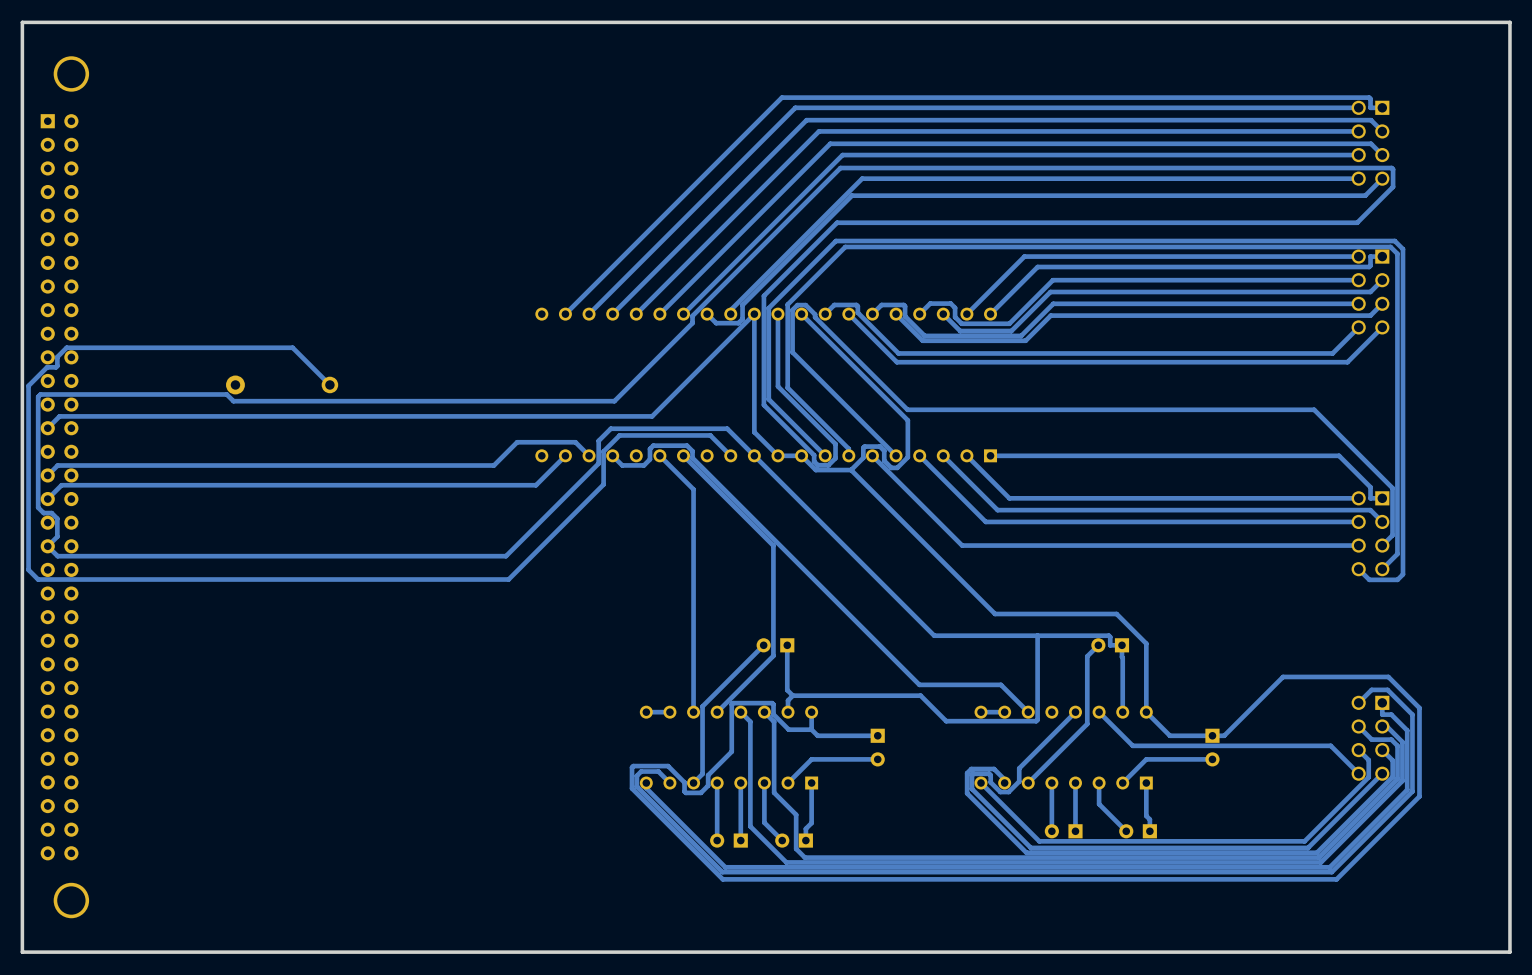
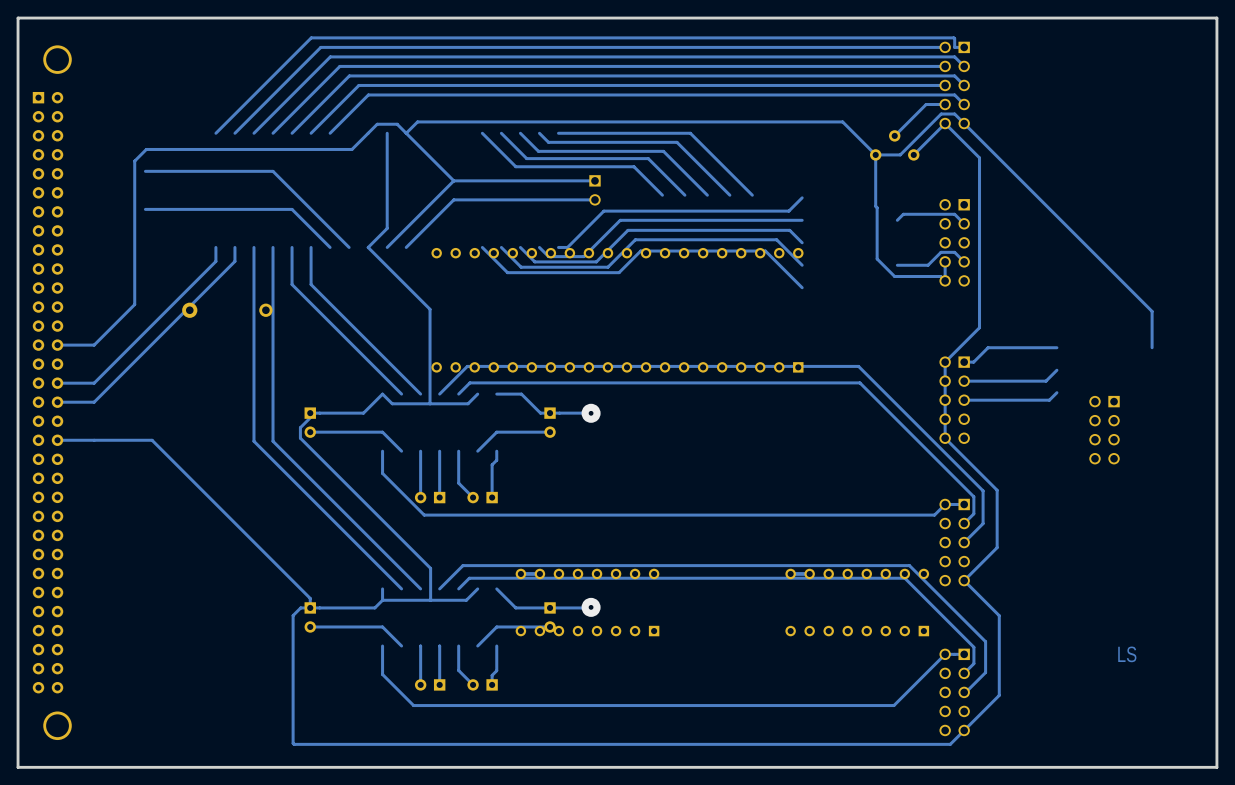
track: none -> (945, 47) (320, 47) (234, 133)
track: none -> (964, 47) (954, 47) (953, 37) (311, 37) (215, 133)
track: none -> (945, 66) (339, 66) (273, 133)
track: none -> (964, 66) (954, 56) (330, 56) (253, 133)
track: none -> (945, 85) (358, 85) (311, 133)
part: none -> (954, 85)
track: none -> (964, 85) (954, 75) (349, 75) (292, 133)
track: (1358, 107) (795, 107) (589, 314) -> none
track: (1382, 107) (1370, 107) (1369, 97) (781, 97) (565, 314) -> none
track: none -> (945, 104) (926, 104) (894, 135)
track: none -> (964, 104) (954, 94) (368, 94) (330, 133)
track: (1358, 131) (818, 131) (636, 314) -> none
track: (1382, 131) (1371, 120) (806, 120) (612, 314) -> none
part: (1370, 143) -> none
track: (1358, 155) (842, 155) (683, 314) -> none
track: (1382, 155) (1371, 143) (830, 143) (659, 314) -> none
track: none -> (387, 133) (387, 228) (368, 247) (430, 309) (430, 403)
track: none -> (406, 133) (417, 121) (842, 121) (875, 154)
track: none -> (482, 133) (515, 166) (633, 166) (662, 195)
track: none -> (501, 133) (526, 158) (648, 158) (684, 195)
track: none -> (520, 133) (538, 151) (663, 151) (707, 195)
track: none -> (539, 133) (548, 142) (676, 142) (729, 195)
track: none -> (558, 133) (690, 133) (752, 195)
track: (1358, 178) (862, 178) (730, 310) (730, 314) -> none
track: (1382, 178) (1365, 195) (852, 195) (742, 305) (742, 319) (738, 323) (716, 323) (707, 314) -> none
part: none -> (894, 145)
track: none -> (875, 154) (900, 154) (941, 114) (954, 114) (1152, 311) (1152, 347)
track: none -> (875, 154) (877, 258) (894, 276) (940, 276) (945, 280) (945, 261)
track: none -> (913, 154) (945, 123) (979, 157) (979, 327) (945, 362) (945, 438) (997, 490) (997, 547) (964, 580) (999, 615) (999, 695) (950, 744) (294, 744) (293, 615) (300, 607) (374, 607) (382, 600)
track: none -> (145, 171) (273, 171) (349, 247)
track: none -> (595, 180) (453, 180)
part: none -> (595, 190)
track: none -> (802, 197) (788, 211) (603, 211) (567, 247) (558, 247)
track: none -> (595, 199) (453, 199) (406, 247)
track: (1358, 256) (1024, 256) (966, 314) -> none
track: (1382, 256) (1370, 256) (1369, 266) (1037, 266) (990, 314) -> none
track: none -> (145, 209) (292, 209) (330, 247)
track: none -> (802, 220) (620, 220) (583, 256) (548, 256) (539, 247)
track: none -> (897, 220) (903, 214) (954, 214) (964, 223)
track: (1358, 280) (1052, 280) (1009, 323) (961, 323) (955, 317) (955, 307) (950, 303) (930, 303) (919, 314) -> none
track: (1382, 280) (1370, 291) (1050, 291) (1011, 331) (960, 331) (943, 314) -> none
part: (1370, 291) -> none
track: none -> (802, 242) (789, 230) (627, 230) (596, 261) (534, 261) (520, 247)
part: none -> (954, 242)
track: (1358, 303) (1053, 303) (1021, 335) (924, 335) (905, 316) (903, 304) (881, 304) (872, 314) -> none
track: (1382, 303) (1370, 315) (1050, 315) (1025, 340) (922, 340) (896, 314) -> none
track: none -> (215, 247) (215, 261) (94, 383) (56, 383)
track: none -> (234, 247) (234, 261) (94, 402) (56, 402)
track: none -> (253, 247) (253, 441) (401, 588)
track: none -> (273, 247) (273, 441) (420, 588)
track: none -> (292, 247) (292, 284) (401, 394)
track: none -> (311, 247) (311, 284) (420, 394)
track: none -> (387, 247) (453, 181) (397, 124) (377, 124) (351, 149) (146, 149) (134, 161) (134, 304) (94, 345) (56, 345)
track: none -> (482, 247) (507, 272) (619, 272) (640, 251) (765, 251) (802, 287)
track: none -> (501, 247) (521, 267) (607, 267) (635, 239) (776, 239) (802, 265)
track: (777, 314) (777, 386) (835, 444) (835, 458) (828, 465) (817, 465) (814, 461) (814, 455) (763, 405) (763, 295) (837, 222) (1357, 222) (1393, 186) (1393, 169) (840, 168) (692, 315) (692, 323) (614, 401) (233, 401) (226, 394) (40, 394) (38, 396) (38, 507) (43, 513) (51, 513) (57, 518) (57, 536) (47, 546) (57, 556) (506, 556) (598, 463) (598, 440) (610, 428) (727, 428) (934, 635) (1108, 635) (1110, 645) (1121, 645) (1122, 712) -> none
track: (801, 314) (907, 420) (907, 457) (897, 467) (891, 467) (884, 460) (884, 450) (879, 446) (864, 446) (863, 457) (851, 470) -> none
track: (825, 314) (834, 304) (856, 304) (857, 312) (898, 353) (1332, 353) (1358, 327) -> none
track: (848, 314) (896, 362) (1347, 362) (1382, 327) -> none
track: none -> (964, 261) (954, 252) (940, 252) (928, 265) (897, 265)
track: (329, 384) (292, 347) (66, 347) (57, 357) (56, 367) (47, 367) (28, 385) (28, 569) (38, 579) (508, 579) (603, 484) (603, 451) (619, 435) (710, 435) (730, 455) -> none
track: (47, 428) (59, 416) (652, 416) (754, 314) (754, 432) (777, 455) (801, 455) (815, 470) (851, 470) -> none
track: none -> (1056, 347) (988, 347) (973, 362) (964, 362)
track: (565, 455) (536, 485) (61, 485) (47, 499) -> none
track: (589, 455) (575, 442) (517, 442) (493, 465) (57, 465) (47, 475) -> none
track: (612, 455) (622, 465) (643, 465) (649, 459) (649, 448) (653, 445) (686, 445) (692, 451) (692, 457) (919, 684) (1000, 684) (1028, 712) -> none
track: (659, 455) (693, 489) (693, 712) -> none
track: (683, 455) (773, 545) (773, 655) (717, 712) -> none
track: (825, 455) (768, 399) (768, 308) (835, 241) (1394, 241) (1402, 249) (1402, 574) (1397, 579) (1369, 579) (1358, 569) -> none
track: (848, 455) (848, 448) (787, 387) (787, 304) (845, 246) (1390, 246) (1397, 253) (1397, 554) (1382, 569) -> none
track: (872, 455) (962, 545) (1358, 545) -> none
track: (896, 455) (792, 352) (792, 310) (797, 305) (805, 305) (815, 314) (815, 317) (907, 409) (1314, 409) (1392, 488) (1392, 535) (1382, 545) -> none
track: (919, 455) (985, 521) (1358, 521) -> none
track: (943, 455) (997, 510) (1370, 510) (1382, 521) -> none
track: (966, 455) (1009, 498) (1358, 498) -> none
track: (990, 455) (1339, 455) (1370, 487) (1370, 498) (1382, 498) -> none
track: none -> (1056, 370) (1045, 381) (964, 381)
track: (851, 470) (995, 613) (1116, 613) (1146, 643) (1146, 712) (1169, 735) (1224, 735) (1283, 676) (1388, 676) (1419, 708) (1419, 796) (1336, 879) (722, 879) (632, 788) (633, 766) (668, 766) (684, 782) (685, 792) (700, 792) (708, 785) (708, 775) (731, 751) (733, 703) (772, 703) (773, 714) (788, 729) (811, 729) -> none
track: none -> (1056, 392) (1049, 400) (964, 400)
track: none -> (439, 394) (467, 366) (858, 366) (983, 490) (983, 523) (964, 542)
track: none -> (458, 394) (469, 382) (859, 382) (973, 496) (973, 513) (964, 523)
track: none -> (477, 394) (468, 403) (392, 403) (382, 394) (363, 413) (310, 413)
track: none -> (496, 394) (521, 394) (540, 413) (591, 413)
part: none -> (954, 400)
track: none -> (315, 413) (300, 427) (300, 438) (430, 568) (430, 600)
via: none -> (591, 413)
part: none -> (310, 422)
part: none -> (550, 422)
track: none -> (310, 432) (382, 432) (401, 451)
track: none -> (550, 432) (496, 432) (477, 451)
track: none -> (56, 440) (152, 440) (310, 598) (310, 607)
track: none -> (382, 451) (382, 473) (424, 515) (934, 515) (945, 504) (964, 504)
track: none -> (420, 451) (420, 497)
track: none -> (439, 451) (439, 497)
track: none -> (458, 451) (458, 483) (473, 497)
track: none -> (496, 451) (496, 460) (492, 464) (492, 497)
part: none -> (430, 497)
part: none -> (482, 497)
track: (1037, 635) (1036, 721) (946, 721) (920, 695) (792, 695) -> none
track: (763, 645) (702, 706) (702, 774) (693, 783) -> none
part: (775, 645) -> none
track: (787, 645) (787, 690) (792, 695) -> none
track: (1098, 645) (1087, 656) (1087, 723) (1028, 783) -> none
part: (1110, 645) -> none
part: none -> (954, 542)
track: (792, 695) (788, 700) (788, 712) -> none
track: (1358, 702) (1371, 689) (1387, 689) (1412, 714) (1412, 791) (1331, 872) (722, 872) (636, 786) (636, 775) (641, 771) (658, 771) (669, 783) -> none
track: (1382, 702) (1382, 714) (1391, 714) (1407, 730) (1407, 789) (1329, 867) (725, 867) (646, 788) (646, 783) -> none
track: (740, 712) (750, 721) (750, 826) (786, 862) (1320, 862) (1402, 781) (1402, 742) (1386, 726) (1382, 726) -> none
track: (764, 712) (774, 721) (774, 792) (796, 814) (796, 848) (804, 857) (1318, 857) (1397, 778) (1397, 745) (1391, 739) (1371, 739) (1358, 726) -> none
track: (811, 712) (811, 729) -> none
track: (1075, 712) (1019, 768) (1019, 781) (1008, 792) (1000, 792) (990, 782) (989, 773) (971, 775) (971, 789) (1030, 847) (1308, 847) (1382, 773) -> none
track: (1099, 712) (1132, 745) (1330, 745) (1358, 773) -> none
track: (811, 729) (817, 735) (877, 735) -> none
track: none -> (382, 588) (382, 600)
track: none -> (439, 588) (462, 565) (909, 565) (985, 641) (985, 672) (964, 692)
track: none -> (458, 588) (469, 578) (904, 578) (973, 647) (973, 663) (964, 673)
track: none -> (477, 588) (466, 600) (382, 600)
track: none -> (496, 588) (515, 607) (591, 607)
part: (1370, 738) -> none
part: (877, 747) -> none
part: (1212, 747) -> none
track: (1358, 750) (1368, 760) (1368, 777) (1304, 841) (1039, 841) (981, 783) -> none
track: (1382, 750) (1392, 760) (1392, 776) (1316, 852) (1026, 852) (967, 793) (967, 773) (971, 769) (994, 769) (1004, 779) (1004, 783) -> none
via: none -> (591, 607)
track: (877, 759) (811, 759) (788, 783) -> (550, 626) (496, 626) (477, 646)
track: (1212, 759) (1146, 759) (1122, 783) -> none
part: none -> (310, 617)
part: none -> (550, 617)
track: none -> (310, 626) (382, 626) (401, 646)
track: (717, 783) (717, 840) -> none
track: (740, 783) (740, 840) -> none
track: (764, 783) (764, 822) (782, 840) -> none
track: (811, 783) (811, 823) (805, 828) (805, 840) -> none
track: (1051, 783) (1051, 831) -> none
track: (1075, 783) (1075, 831) -> none
track: (1099, 783) (1099, 804) (1126, 831) -> none
track: (1146, 783) (1146, 815) (1149, 819) (1149, 831) -> none
track: none -> (382, 646) (382, 674) (413, 705) (893, 705) (945, 654) (964, 654)
track: none -> (420, 646) (420, 684)
track: none -> (439, 646) (439, 684)
track: none -> (458, 646) (458, 670) (473, 684)
track: none -> (496, 646) (496, 670) (492, 675) (492, 684)
text: none -> LS (1127, 654)
part: (1063, 831) -> none
part: (1138, 831) -> none
part: (728, 840) -> none
part: (794, 840) -> none
part: none -> (430, 684)
part: none -> (482, 684)
part: none -> (954, 692)

